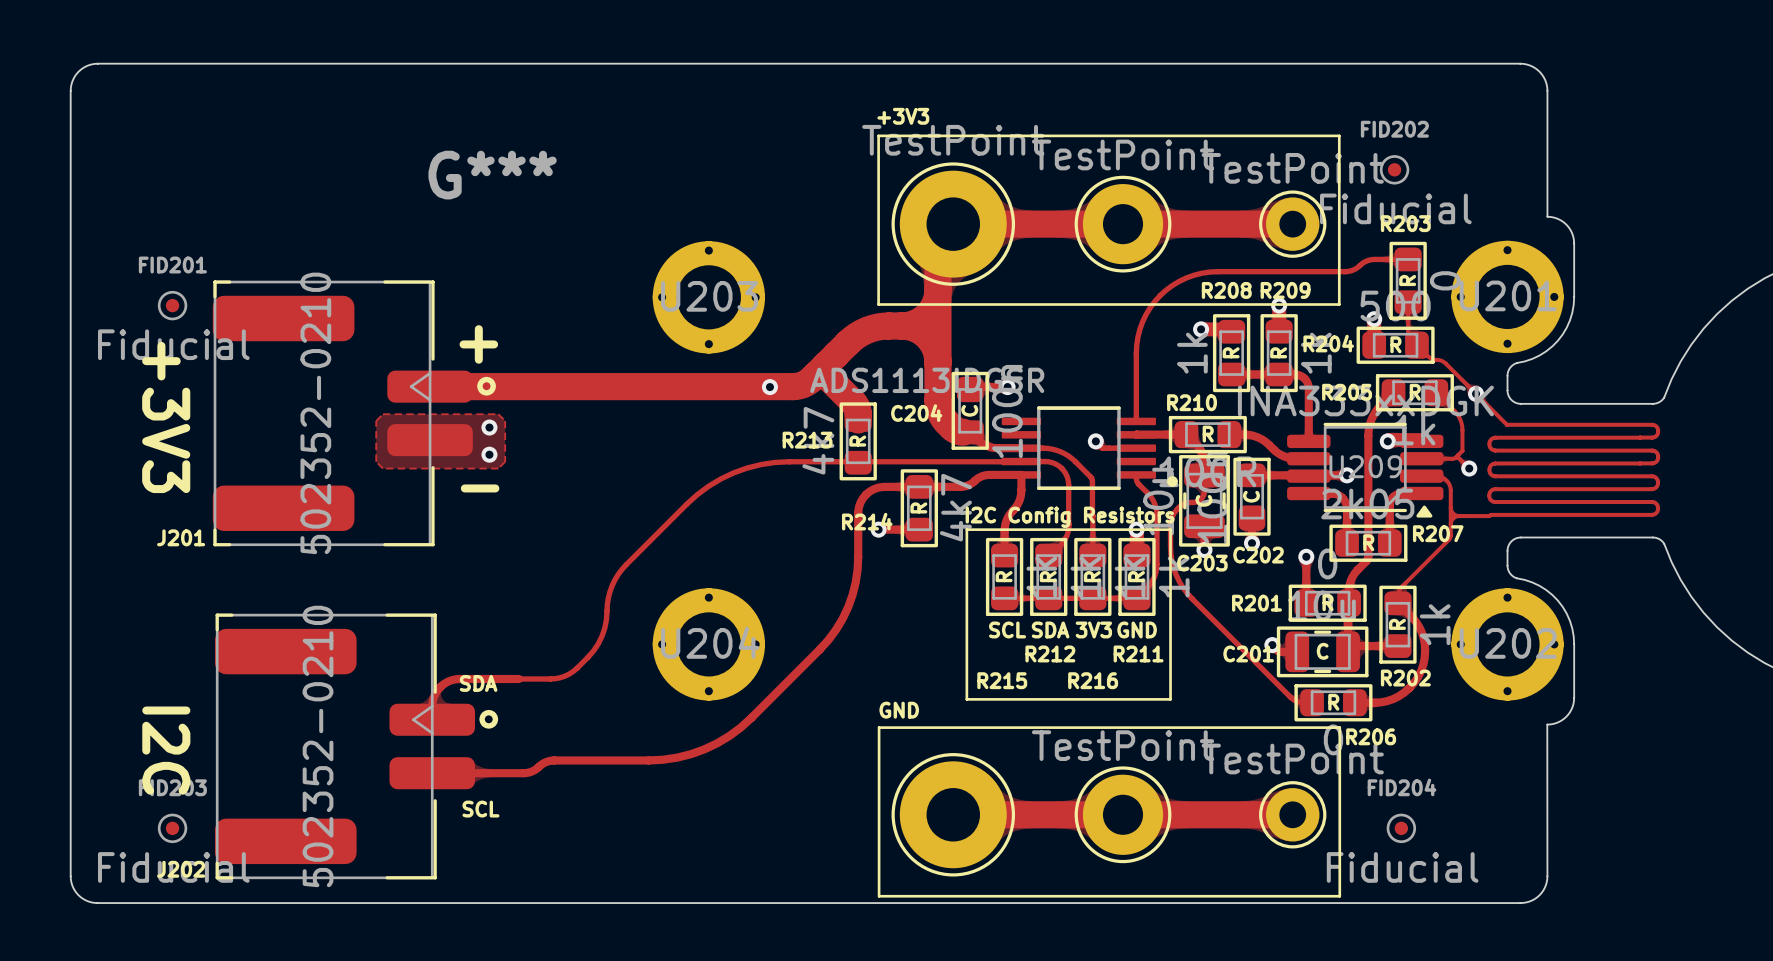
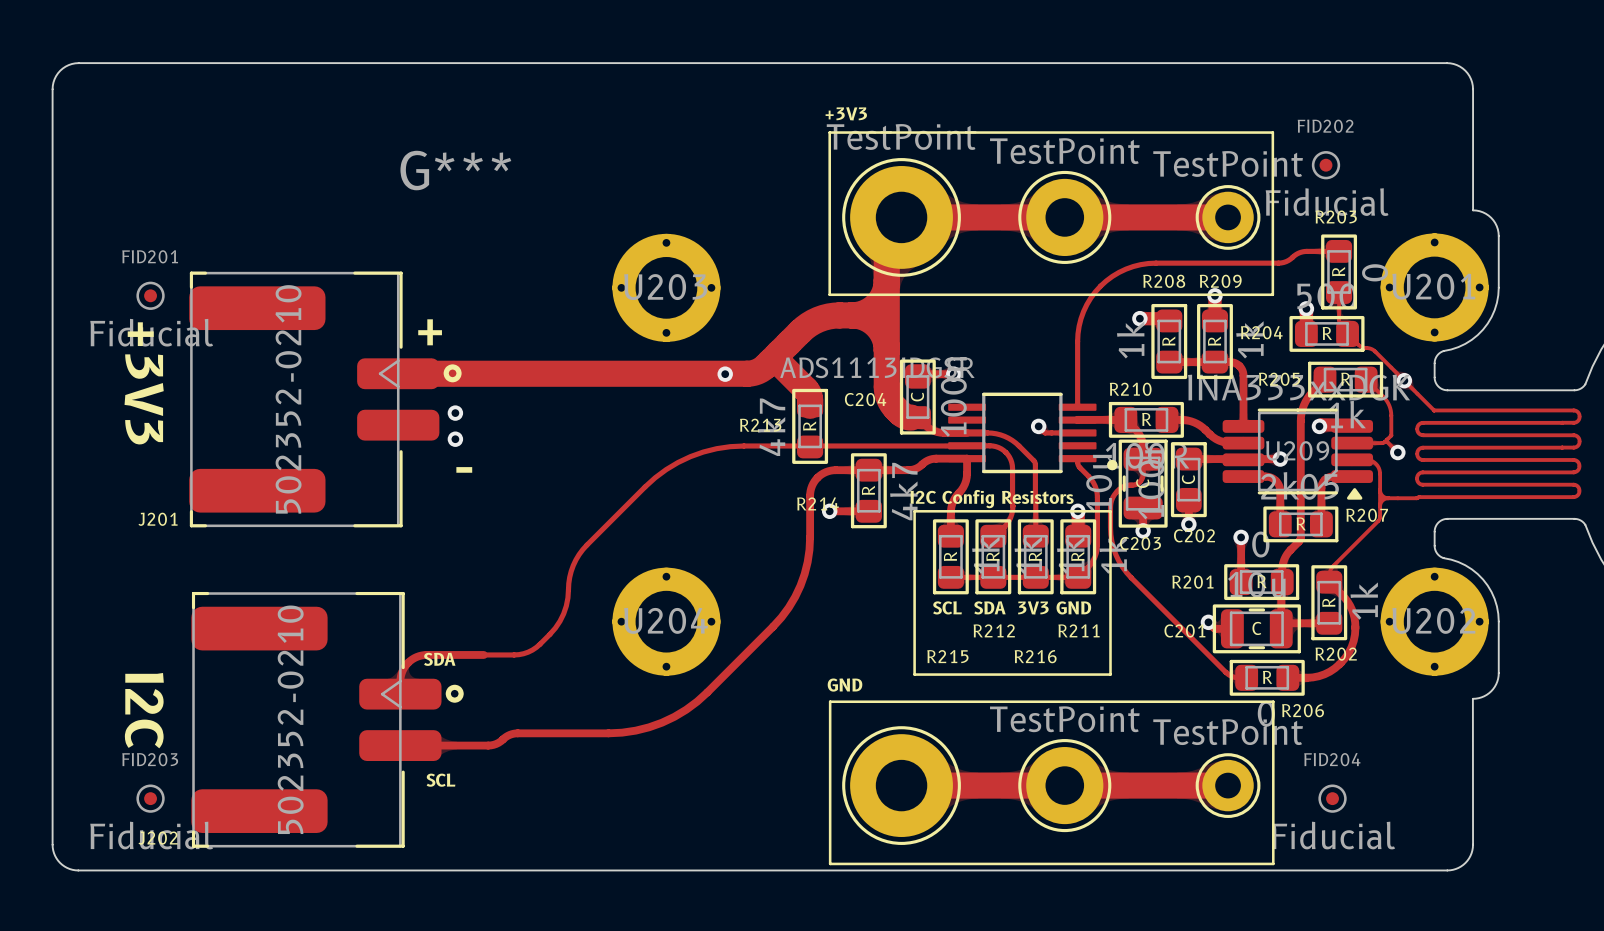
zone outline: (382, 414) (498, 414) (505, 421) (505, 461) (498, 468) (382, 468) (376, 461) (376, 421) (382, 414) -> none

